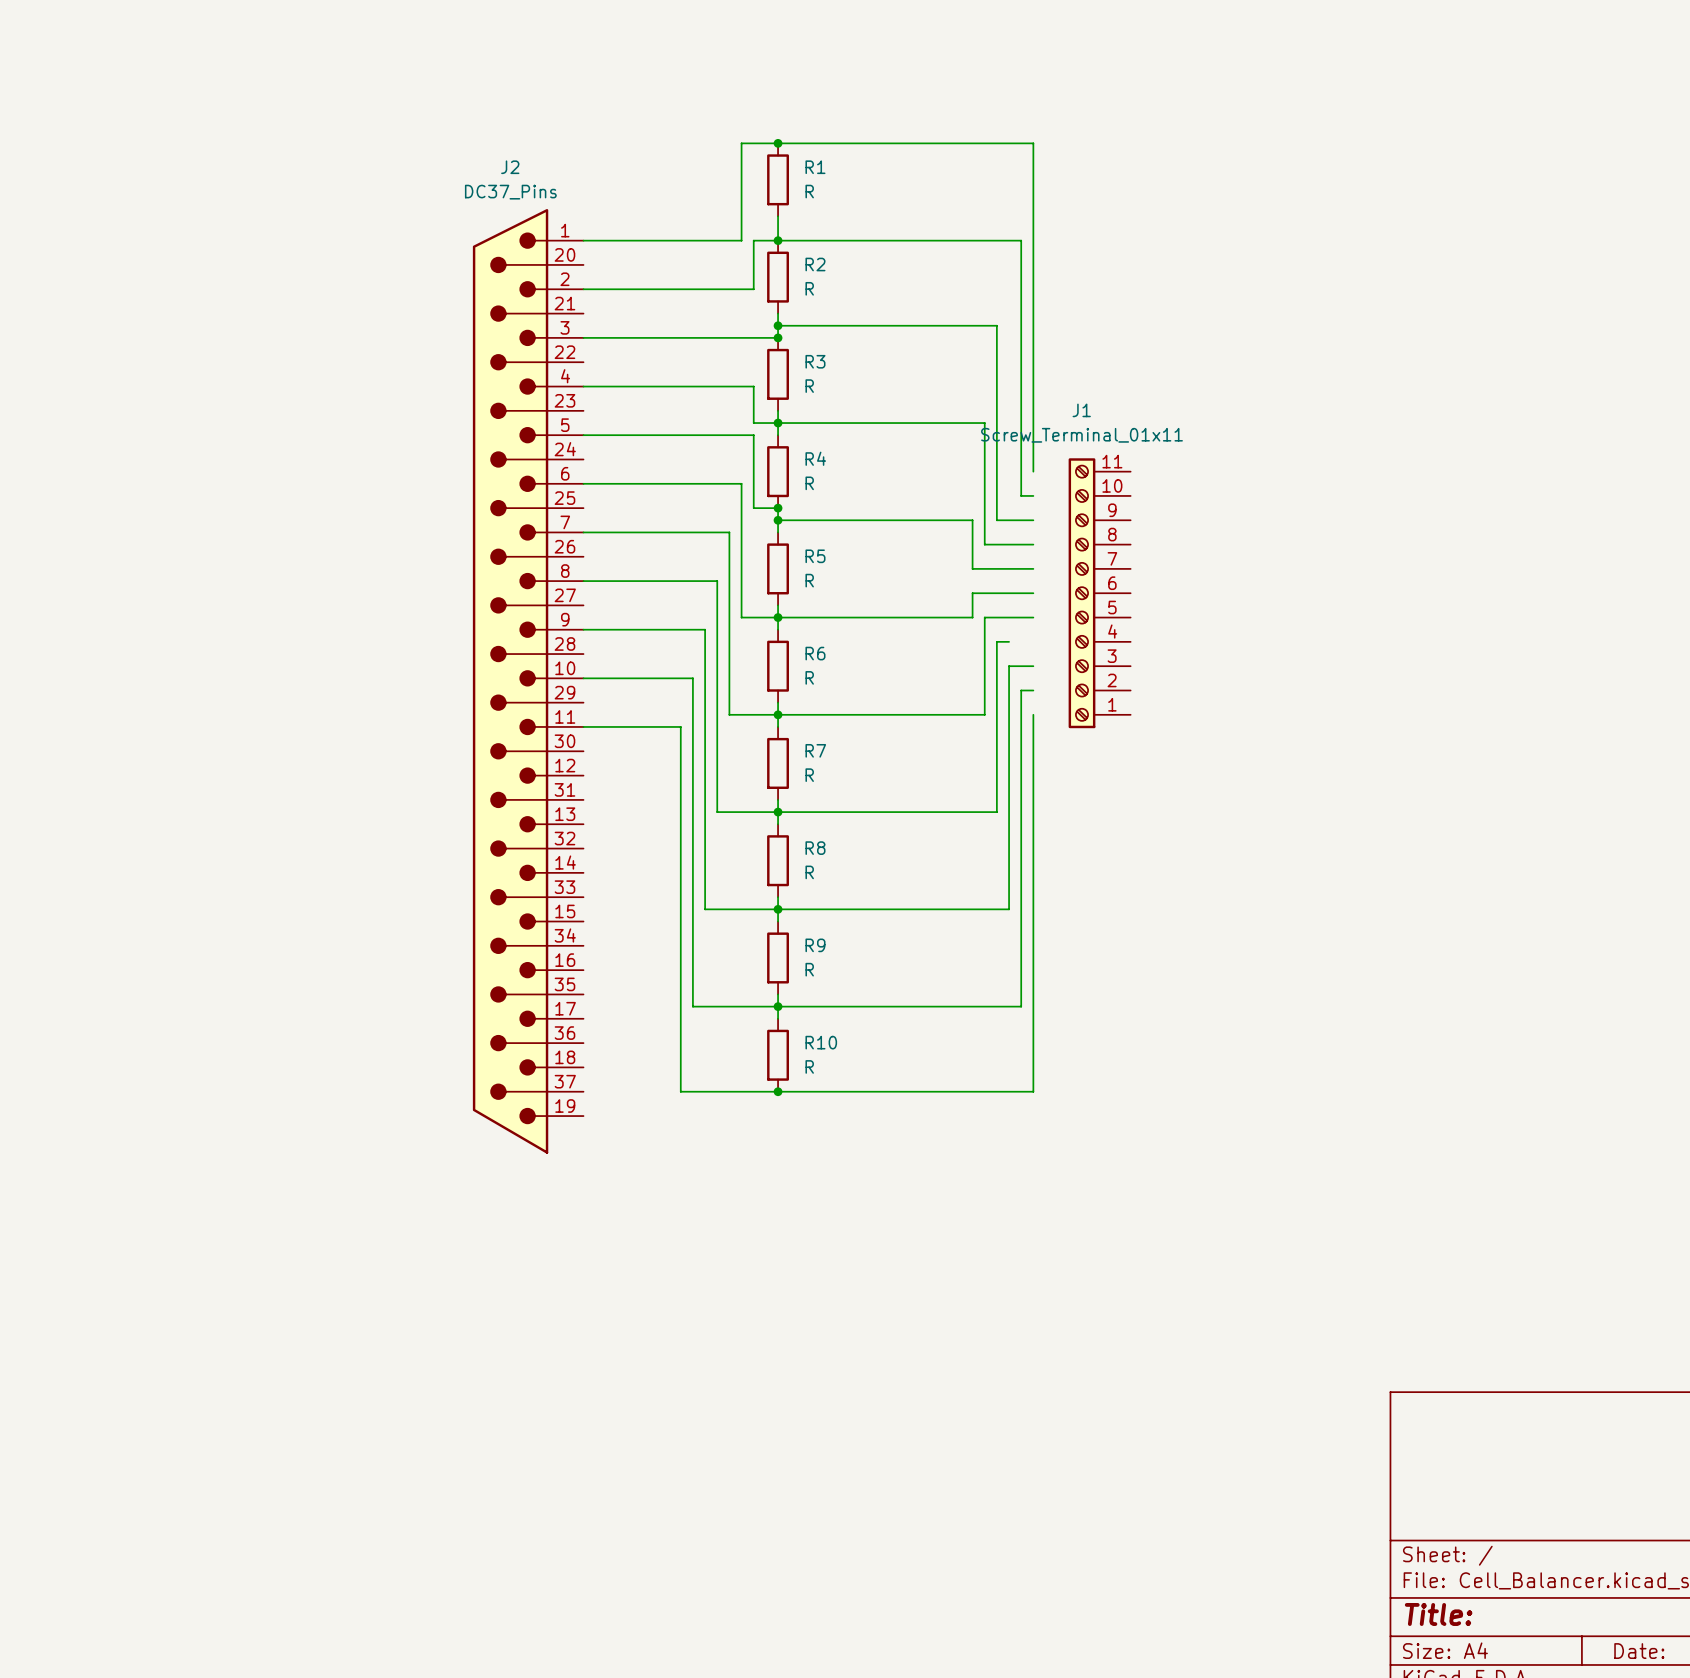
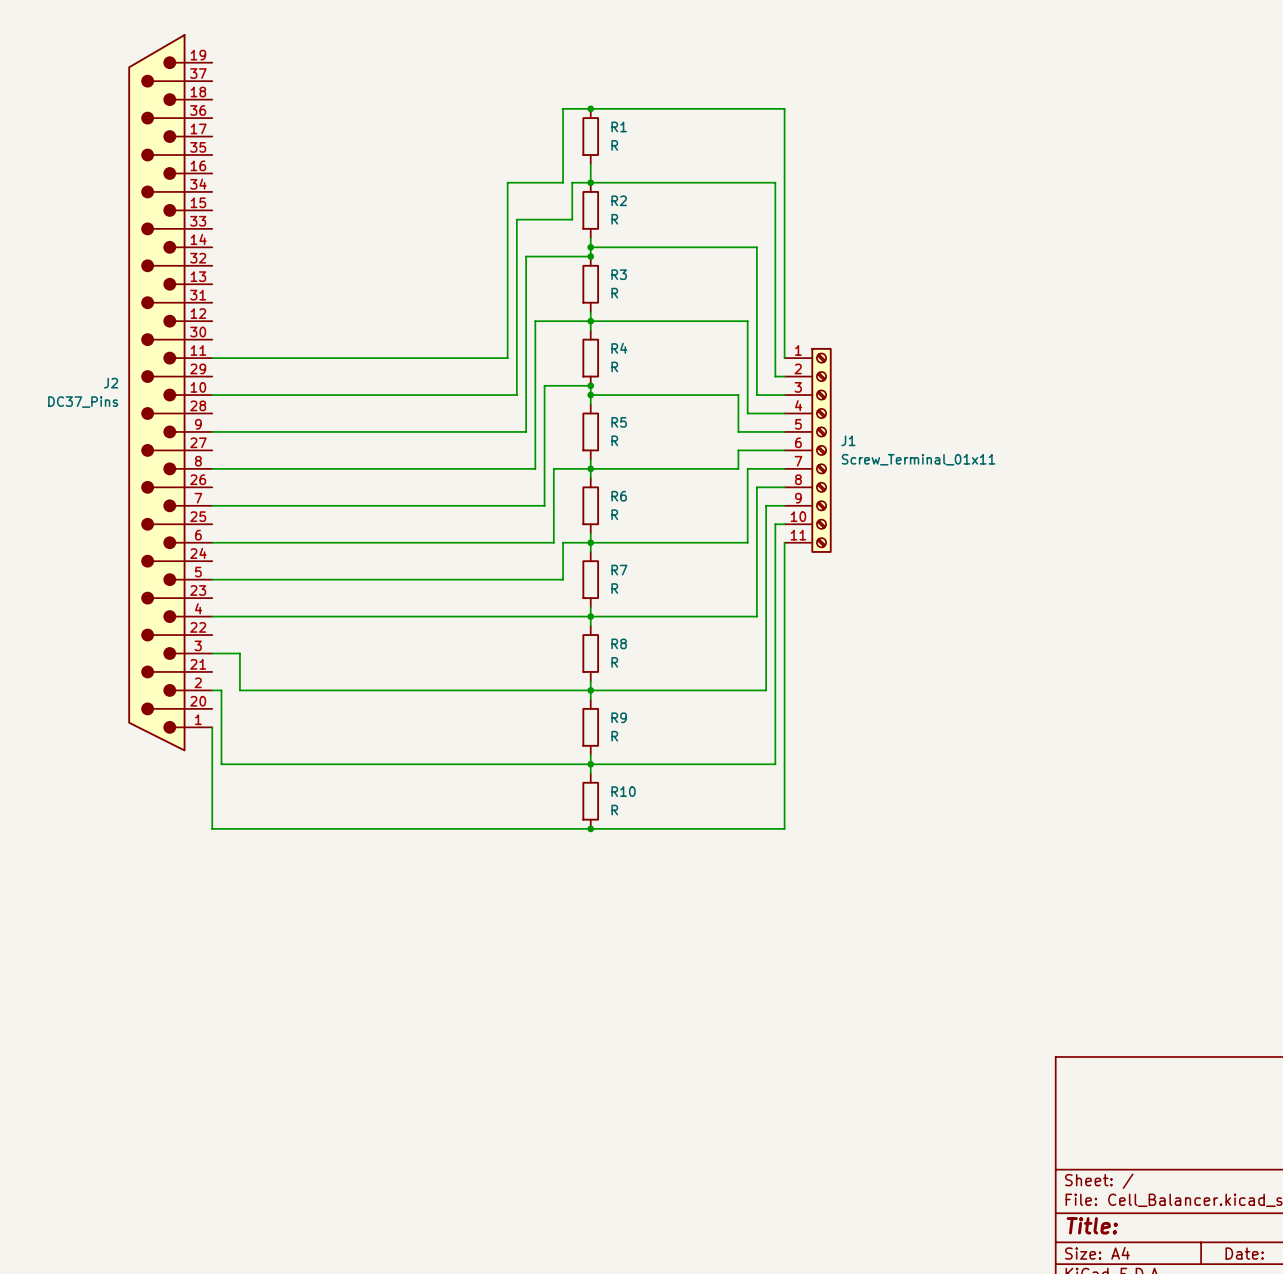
J2 name position: J2 (510, 167) -> J2 (111, 383)
J2 value position: DC37_Pins (510, 192) -> DC37_Pins (83, 402)
wire: (583, 240) (668, 240) -> (212, 358) (507, 358) (507, 182)
wire: (583, 289) (680, 289) -> (212, 395) (516, 395) (516, 219)
wire: (583, 337) (692, 337) -> (212, 431) (526, 431) (526, 256)
wire: (583, 386) (753, 386) (753, 423) -> (212, 468) (535, 468) (535, 321) (572, 321)
J1 name position: J1 (1081, 410) -> J1 (848, 440)
wire: (583, 435) (753, 435) (753, 508) -> none
J1 value position: Screw_Terminal_01x11 (1082, 435) -> Screw_Terminal_01x11 (918, 459)
wire: (583, 483) (741, 483) (741, 617) -> none
wire: (583, 532) (729, 532) (729, 617) -> (563, 468) (553, 468)
wire: (583, 581) (717, 581) -> (572, 385) (544, 385) (544, 441)
J1 rotation: 0° (1082, 593) -> 180° (821, 450)
wire: (583, 629) (705, 629) (705, 909) -> (212, 653) (239, 653) (239, 690) (535, 690)
wire: none -> (766, 487) (784, 487)
wire: (717, 666) (717, 812) -> (544, 505) (212, 505)
wire: (583, 678) (692, 678) (692, 1006) -> (212, 690) (221, 690) (221, 764) (526, 764)
J2 flip: as is (510, 681) -> up-down (156, 392)
wire: none -> (212, 542) (553, 542)
wire: (729, 714) (741, 714) -> (212, 579) (563, 579) (563, 542)
wire: (583, 726) (680, 726) (680, 1091) -> (212, 727) (212, 828) (516, 828)
wire: none -> (212, 616) (544, 616)

